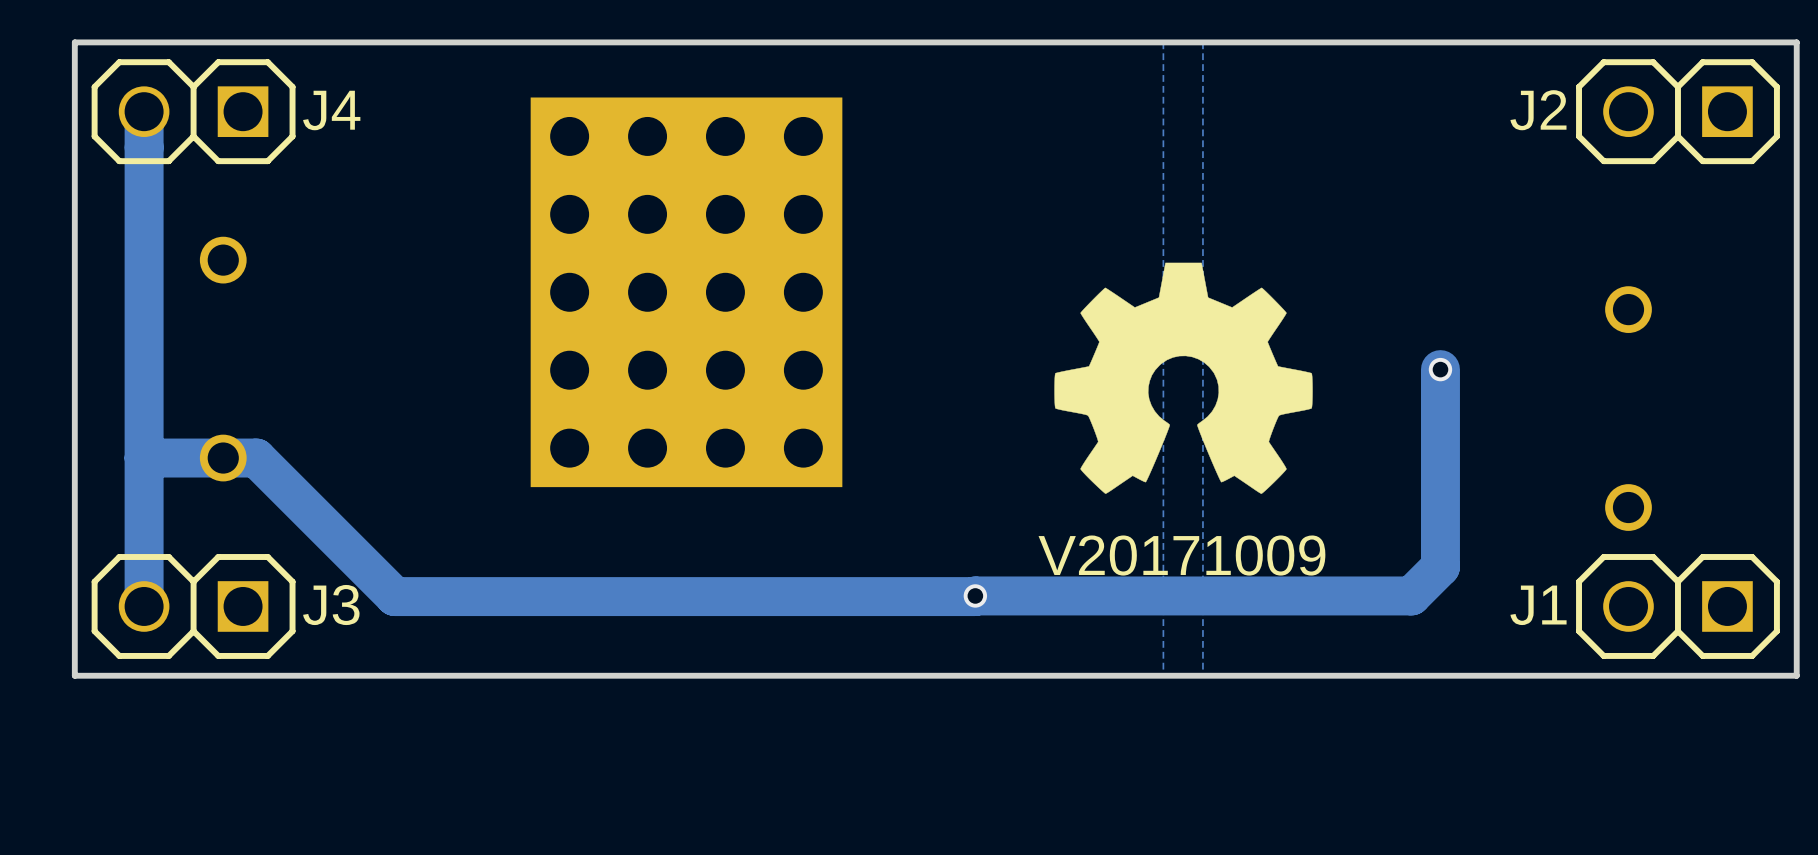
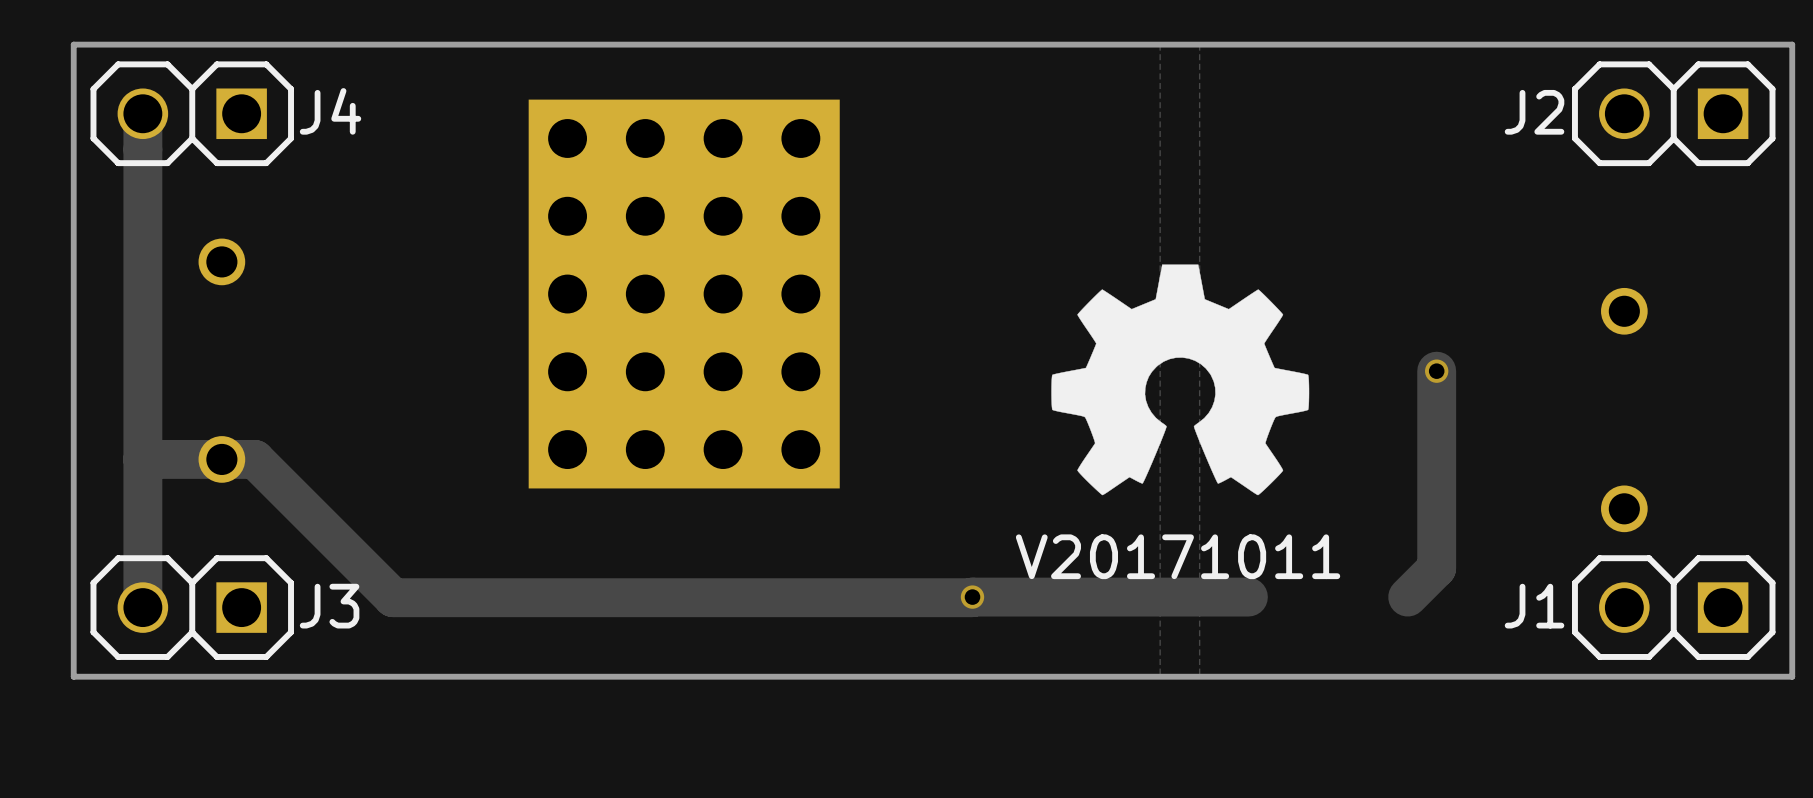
drawing shape: [1038, 535, 1326, 576] -> [1015, 534, 1341, 580]
track: (1411, 595) (1251, 595) -> none

